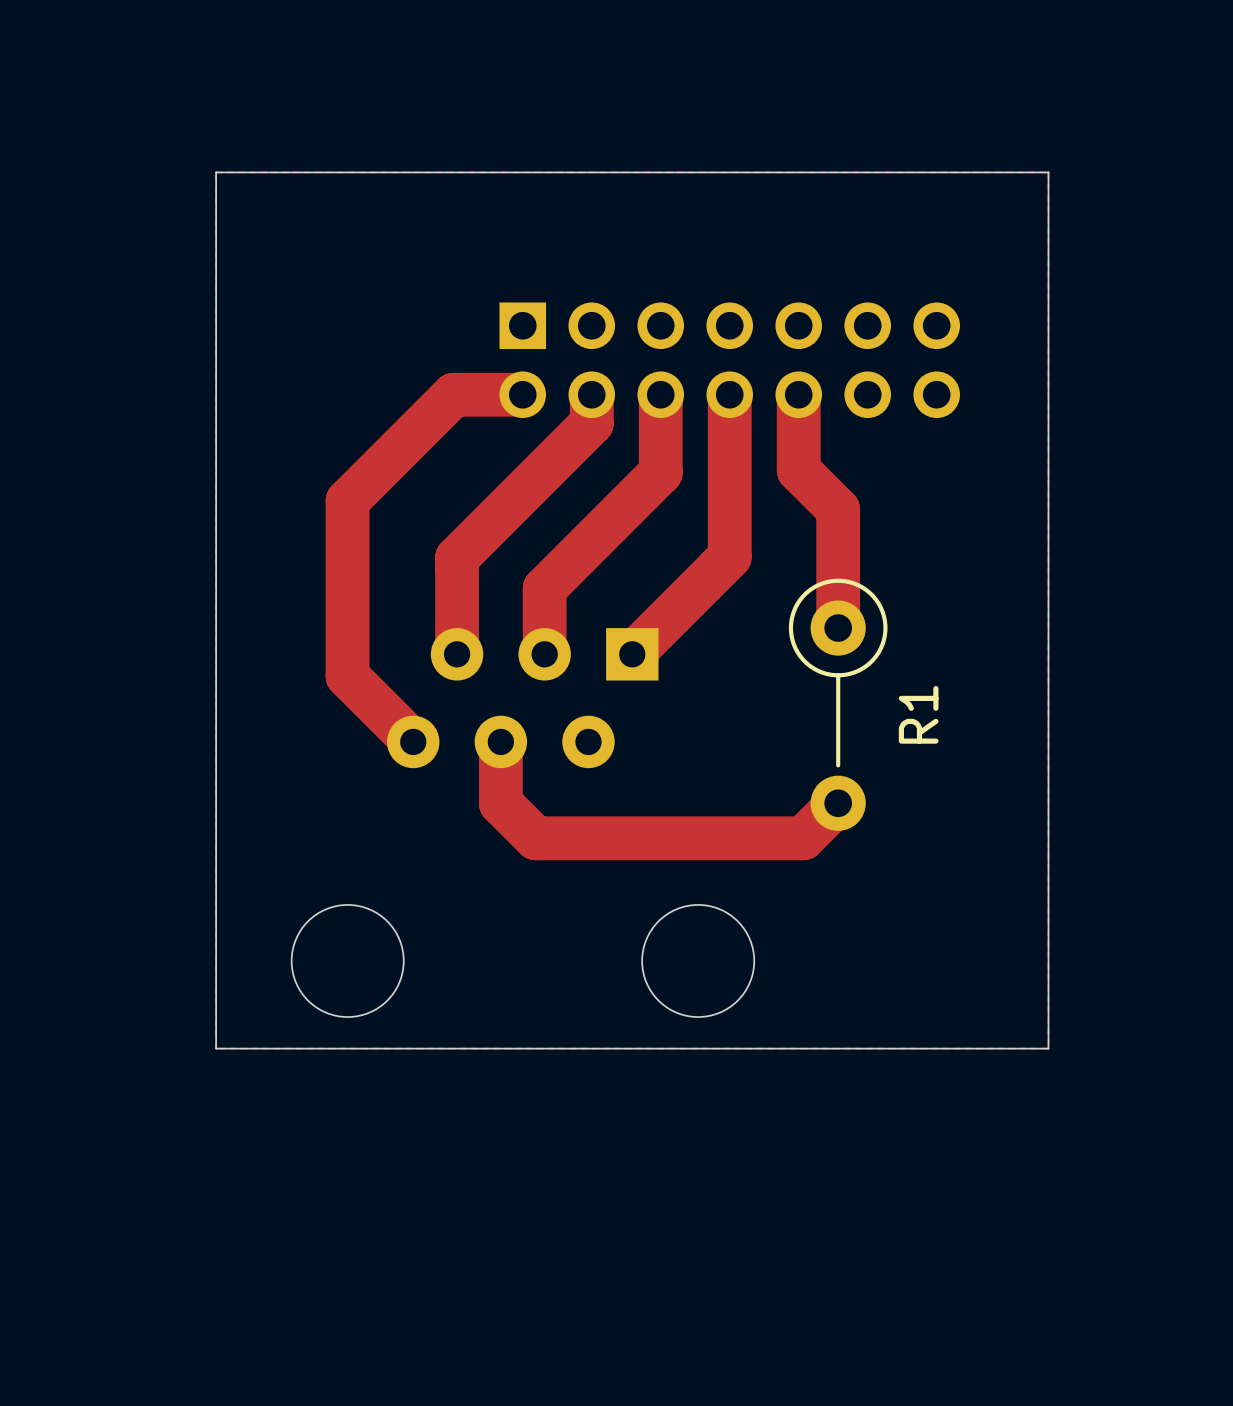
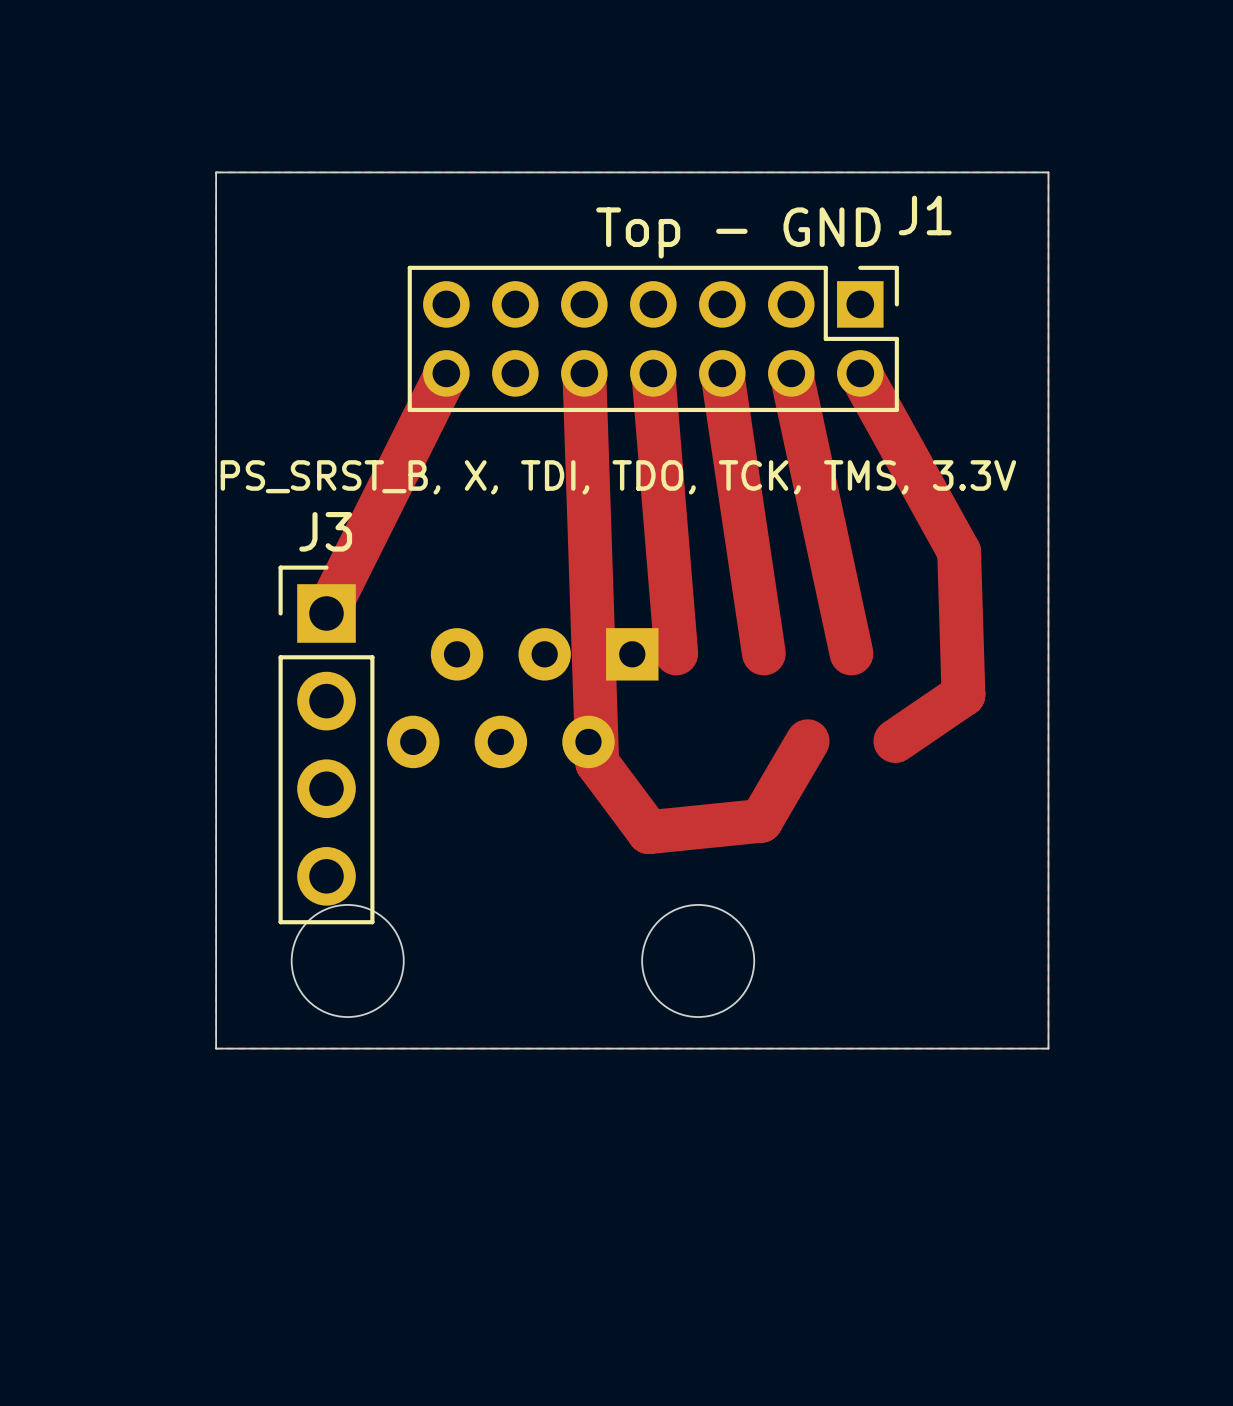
text: none -> Top - GND (738, 232)
J1: none -> (653, 338)
part: (729, 360) -> none
track: none -> (446, 373) (326, 613)
track: none -> (584, 373) (597, 762) (648, 832) (761, 820) (807, 741)
track: none -> (653, 373) (676, 653)
track: none -> (722, 373) (763, 653)
track: none -> (791, 373) (851, 653)
track: none -> (860, 373) (959, 551) (963, 694) (895, 741)
track: (522, 394) (453, 394) (347, 500) (347, 676) (413, 741) -> none
track: (591, 394) (591, 423) (457, 557) (457, 654) -> none
track: (660, 394) (660, 472) (544, 588) (544, 654) -> none
track: (729, 394) (729, 556) (632, 654) -> none
track: (798, 394) (798, 470) (838, 509) (838, 628) -> none
text: none -> PS_SRST_B, X, TDI, TDO, TCK, TMS, 3.3V (618, 477)
R1: (838, 704) -> none
track: (500, 741) (500, 803) (535, 838) (803, 838) (838, 803) -> none
J3: none -> (326, 744)

